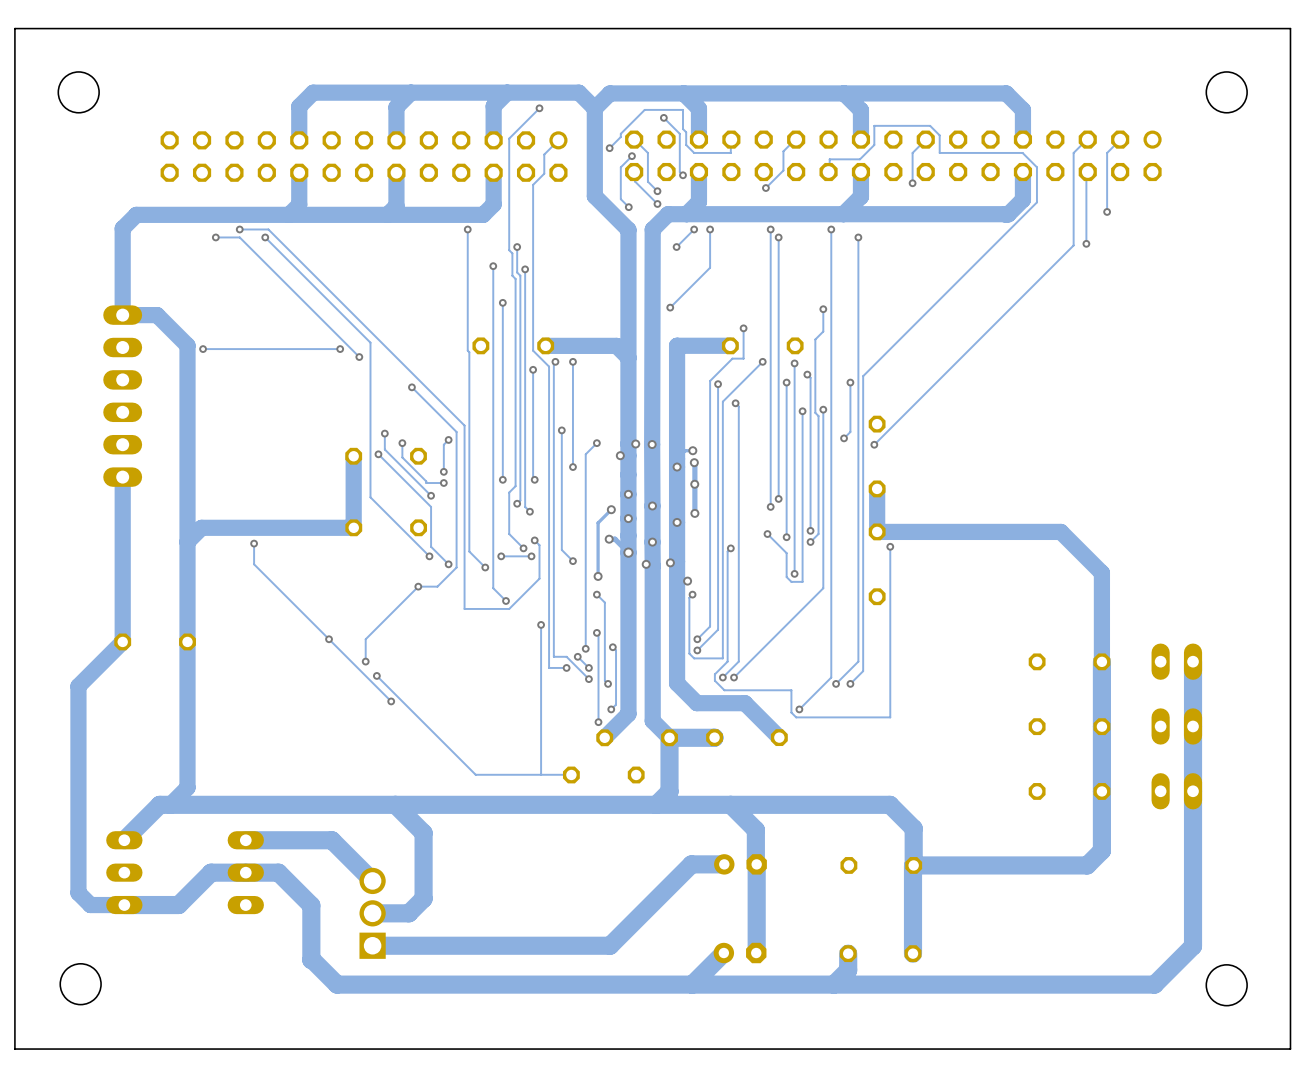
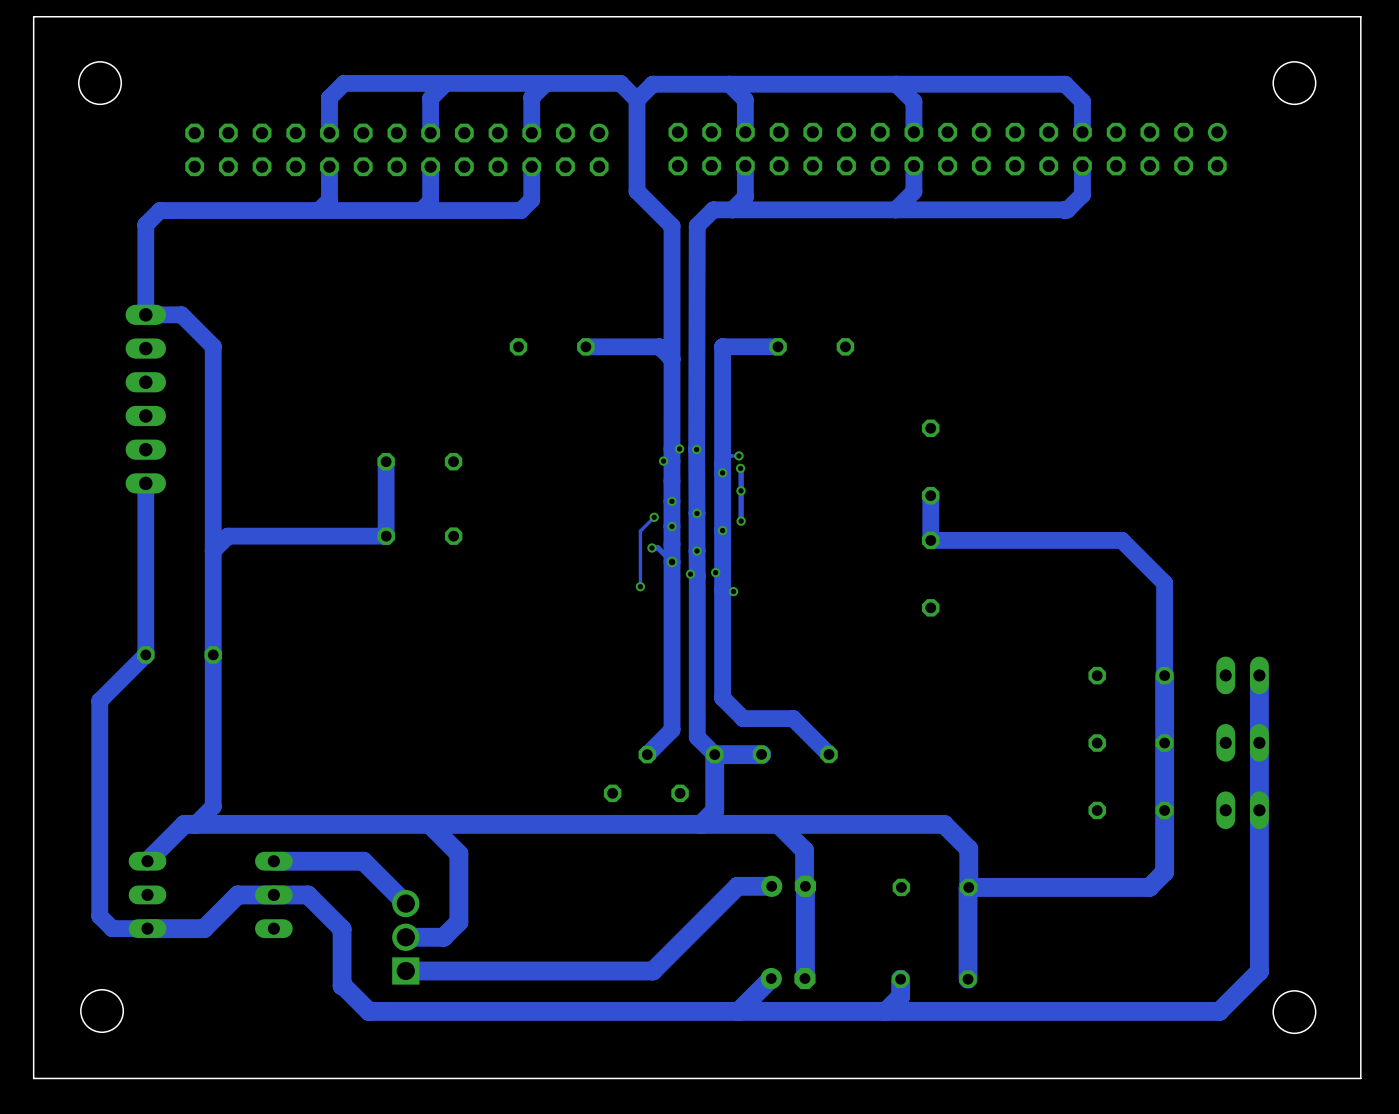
track: (539, 108) (509, 138) (509, 250) (512, 253) (512, 275) (515, 278) (515, 486) (509, 492) (509, 534) (523, 548) -> none
via: (539, 108) -> none
track: (663, 117) (679, 133) (679, 172) (683, 175) -> none
via: (663, 117) -> none
track: (634, 139) (647, 152) (647, 181) (657, 191) -> none
track: (731, 139) (730, 152) (694, 152) (686, 144) (686, 132) (683, 129) (683, 109) (644, 109) (609, 148) -> none
track: (796, 139) (783, 151) (783, 170) (765, 188) -> none
track: (925, 139) (912, 152) (912, 183) -> none
track: (1087, 139) (1073, 152) (1073, 245) (874, 444) -> none
track: (1120, 139) (1107, 152) (1107, 211) -> none
track: (558, 140) (544, 154) (544, 173) (533, 184) (533, 350) (549, 366) (549, 667) (566, 667) -> none
via: (609, 148) -> none
track: (631, 156) (620, 167) (620, 199) (628, 207) -> none
via: (631, 156) -> none
track: (634, 172) (635, 181) (657, 203) -> none
track: (828, 172) (829, 159) (859, 159) (874, 144) (874, 125) (930, 125) (939, 135) (939, 152) (1022, 152) (1036, 167) (1036, 202) (863, 376) (863, 671) (850, 683) -> none
track: (1087, 172) (1086, 243) -> none
via: (683, 175) -> none
via: (912, 183) -> none
via: (765, 188) -> none
via: (657, 191) -> none
via: (657, 203) -> none
via: (628, 207) -> none
via: (1107, 211) -> none
track: (239, 229) (268, 229) (464, 425) (464, 608) (509, 608) (539, 578) (539, 545) (534, 540) -> none
via: (239, 229) -> none
track: (467, 229) (469, 551) (485, 567) -> none
via: (467, 229) -> none
track: (694, 229) (676, 247) -> none
via: (694, 229) -> none
track: (710, 229) (710, 267) (670, 307) -> none
via: (710, 229) -> none
track: (770, 229) (770, 506) -> none
via: (770, 229) -> none
track: (831, 229) (831, 677) (799, 709) -> none
via: (831, 229) -> none
track: (215, 237) (239, 237) (359, 357) -> none
via: (215, 237) -> none
track: (265, 237) (370, 342) (370, 497) (429, 556) -> none
via: (265, 237) -> none
track: (778, 237) (778, 498) -> none
via: (778, 237) -> none
track: (858, 237) (858, 661) (836, 683) -> none
via: (858, 237) -> none
via: (1086, 243) -> none
track: (517, 247) (517, 272) (520, 275) (520, 500) (517, 503) -> none
via: (517, 247) -> none
via: (676, 247) -> none
track: (493, 266) (493, 588) (506, 600) -> none
via: (493, 266) -> none
track: (525, 269) (525, 506) (529, 511) -> none
via: (525, 269) -> none
track: (502, 302) (502, 479) -> none
via: (502, 302) -> none
via: (670, 307) -> none
track: (823, 309) (823, 331) (815, 339) (815, 412) (818, 416) (818, 534) (810, 542) -> none
via: (823, 309) -> none
track: (743, 328) (743, 358) (732, 358) (710, 380) (710, 626) (697, 639) -> none
via: (743, 328) -> none
via: (203, 349) -> none
track: (340, 349) (203, 349) -> none
via: (340, 349) -> none
via: (359, 357) -> none
track: (555, 361) (553, 363) (553, 656) (566, 656) (588, 679) -> none
via: (555, 361) -> none
track: (572, 361) (572, 467) -> none
via: (572, 361) -> none
track: (762, 361) (722, 401) (722, 658) (694, 658) (689, 653) (689, 597) (692, 594) -> none
via: (762, 361) -> none
track: (794, 363) (794, 573) -> none
via: (794, 363) -> none
track: (533, 369) (533, 478) (534, 479) -> none
via: (533, 369) -> none
track: (807, 374) (810, 377) (810, 530) -> none
via: (807, 374) -> none
track: (786, 382) (786, 537) -> none
via: (786, 382) -> none
track: (850, 382) (850, 431) (844, 438) -> none
via: (850, 382) -> none
track: (718, 384) (718, 629) (697, 650) -> none
via: (718, 384) -> none
track: (411, 387) (456, 431) (456, 567) (437, 586) (418, 586) (365, 639) (365, 661) -> none
via: (411, 387) -> none
track: (735, 403) (738, 406) (738, 661) (722, 677) -> none
via: (735, 403) -> none
track: (823, 409) (823, 588) (734, 677) -> none
via: (823, 409) -> none
track: (802, 411) (802, 581) (791, 581) (786, 577) (786, 553) (767, 534) -> none
via: (802, 411) -> none
track: (561, 430) (561, 549) (572, 561) -> none
via: (561, 430) -> none
track: (384, 433) (384, 449) (431, 495) -> none
via: (384, 433) -> none
via: (844, 438) -> none
track: (448, 439) (443, 444) (443, 471) -> none
via: (448, 439) -> none
track: (402, 443) (402, 457) (426, 483) (443, 483) -> none
via: (402, 443) -> none
track: (596, 443) (585, 454) (585, 648) -> none
via: (596, 443) -> none
via: (874, 444) -> none
track: (378, 454) (431, 506) (431, 546) (448, 564) -> none
via: (378, 454) -> none
via: (572, 467) -> none
via: (443, 471) -> none
via: (502, 479) -> none
via: (534, 479) -> none
via: (443, 483) -> none
via: (431, 495) -> none
via: (778, 498) -> none
via: (517, 503) -> none
via: (770, 506) -> none
via: (529, 511) -> none
via: (810, 530) -> none
via: (767, 534) -> none
via: (786, 537) -> none
via: (534, 540) -> none
via: (810, 542) -> none
track: (254, 543) (254, 564) (391, 701) -> none
via: (254, 543) -> none
track: (890, 546) (890, 717) (796, 717) (791, 712) (791, 690) (724, 690) (714, 680) (714, 674) (727, 661) (727, 551) (730, 548) -> none
via: (890, 546) -> none
via: (523, 548) -> none
via: (730, 548) -> none
via: (429, 556) -> none
via: (501, 556) -> none
track: (531, 556) (501, 556) -> none
via: (531, 556) -> none
via: (572, 561) -> none
via: (448, 564) -> none
via: (485, 567) -> none
via: (794, 573) -> none
via: (418, 586) -> none
track: (596, 594) (604, 602) (604, 680) (608, 683) -> none
via: (596, 594) -> none
via: (692, 594) -> none
via: (506, 600) -> none
track: (541, 624) (541, 774) -> none
via: (541, 624) -> none
track: (596, 632) (598, 634) (598, 722) -> none
via: (596, 632) -> none
via: (329, 639) -> none
via: (697, 639) -> none
track: (612, 647) (616, 650) (616, 704) (611, 709) -> none
via: (612, 647) -> none
via: (585, 648) -> none
via: (697, 650) -> none
track: (577, 656) (588, 667) -> none
via: (577, 656) -> none
via: (365, 661) -> none
via: (566, 667) -> none
via: (588, 667) -> none
track: (376, 675) (475, 774) (571, 774) -> none
via: (376, 675) -> none
via: (722, 677) -> none
via: (734, 677) -> none
via: (588, 679) -> none
via: (608, 683) -> none
via: (836, 683) -> none
via: (850, 683) -> none
via: (391, 701) -> none
via: (611, 709) -> none
via: (799, 709) -> none
via: (598, 722) -> none

